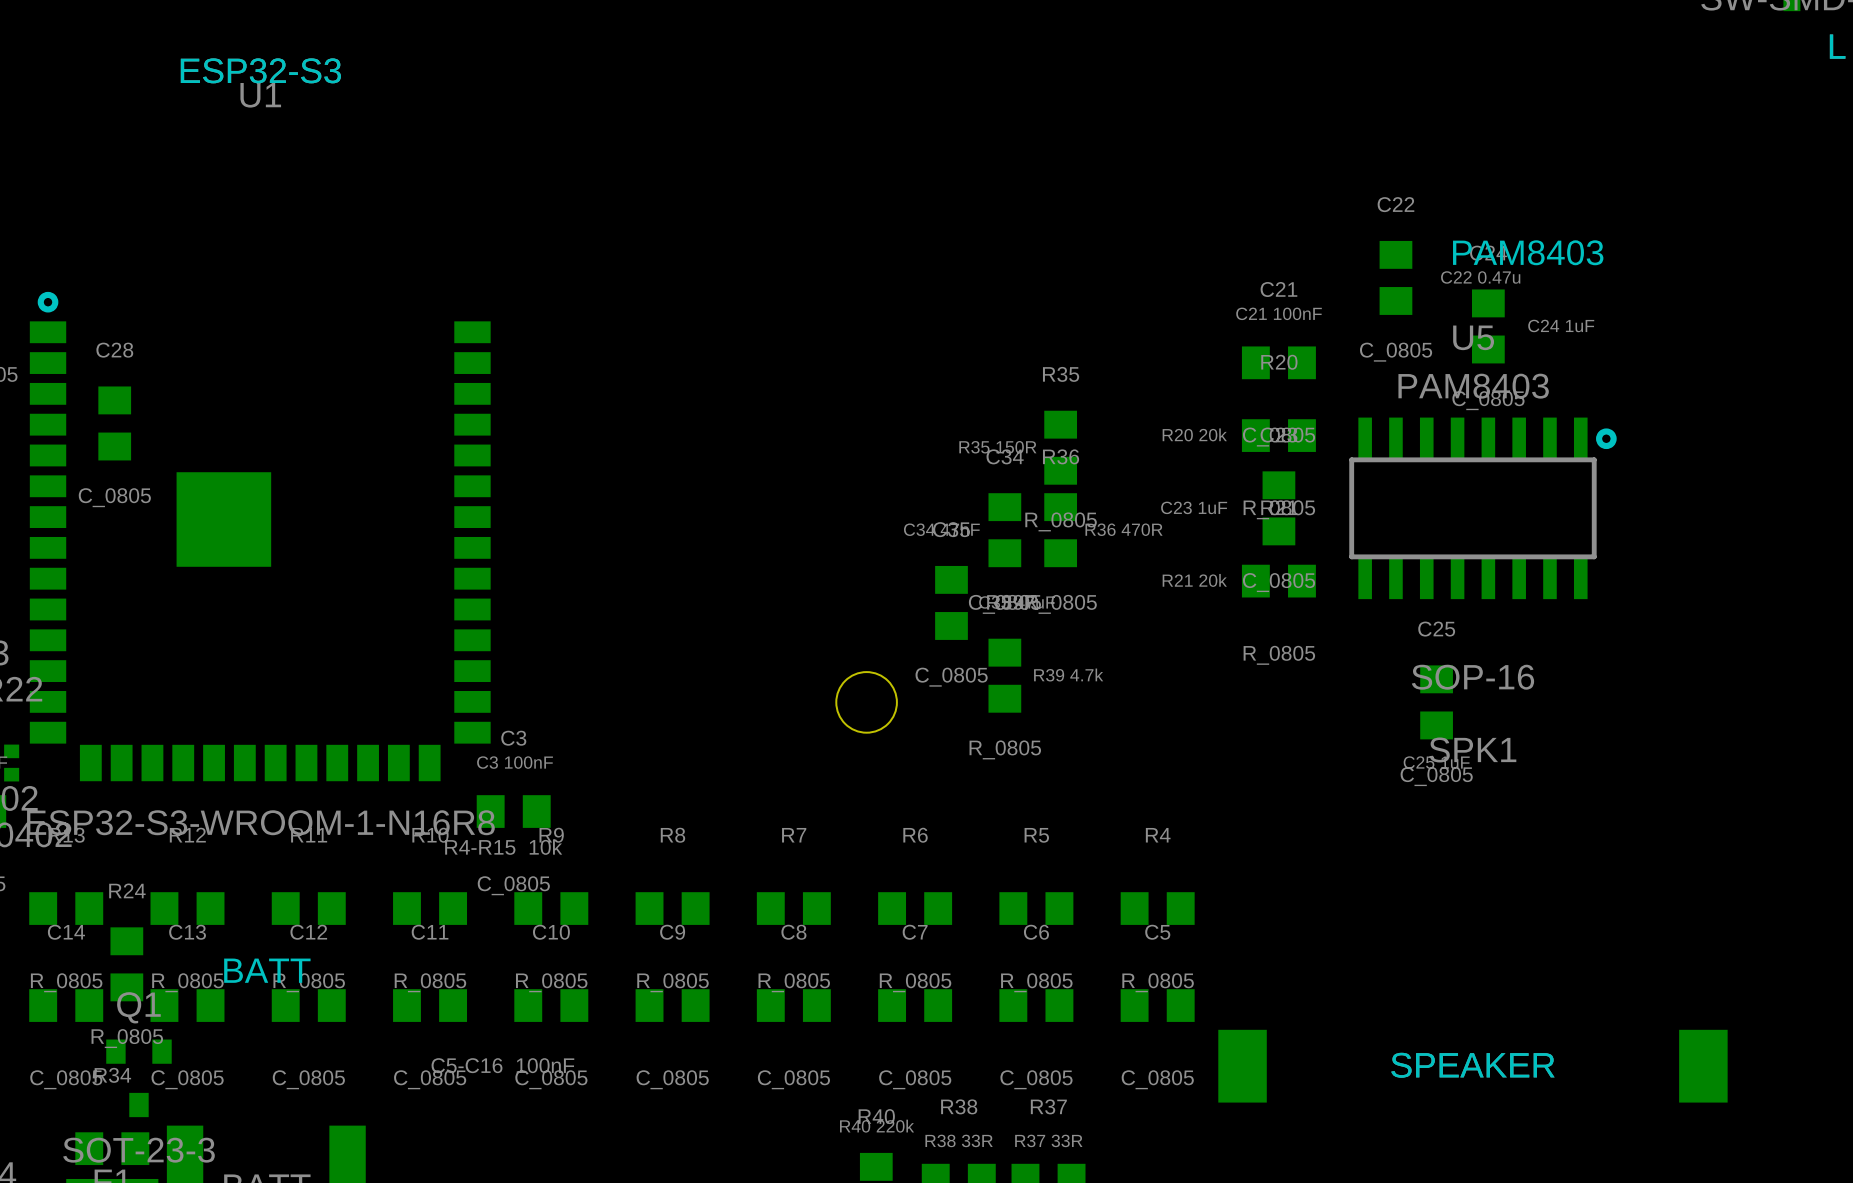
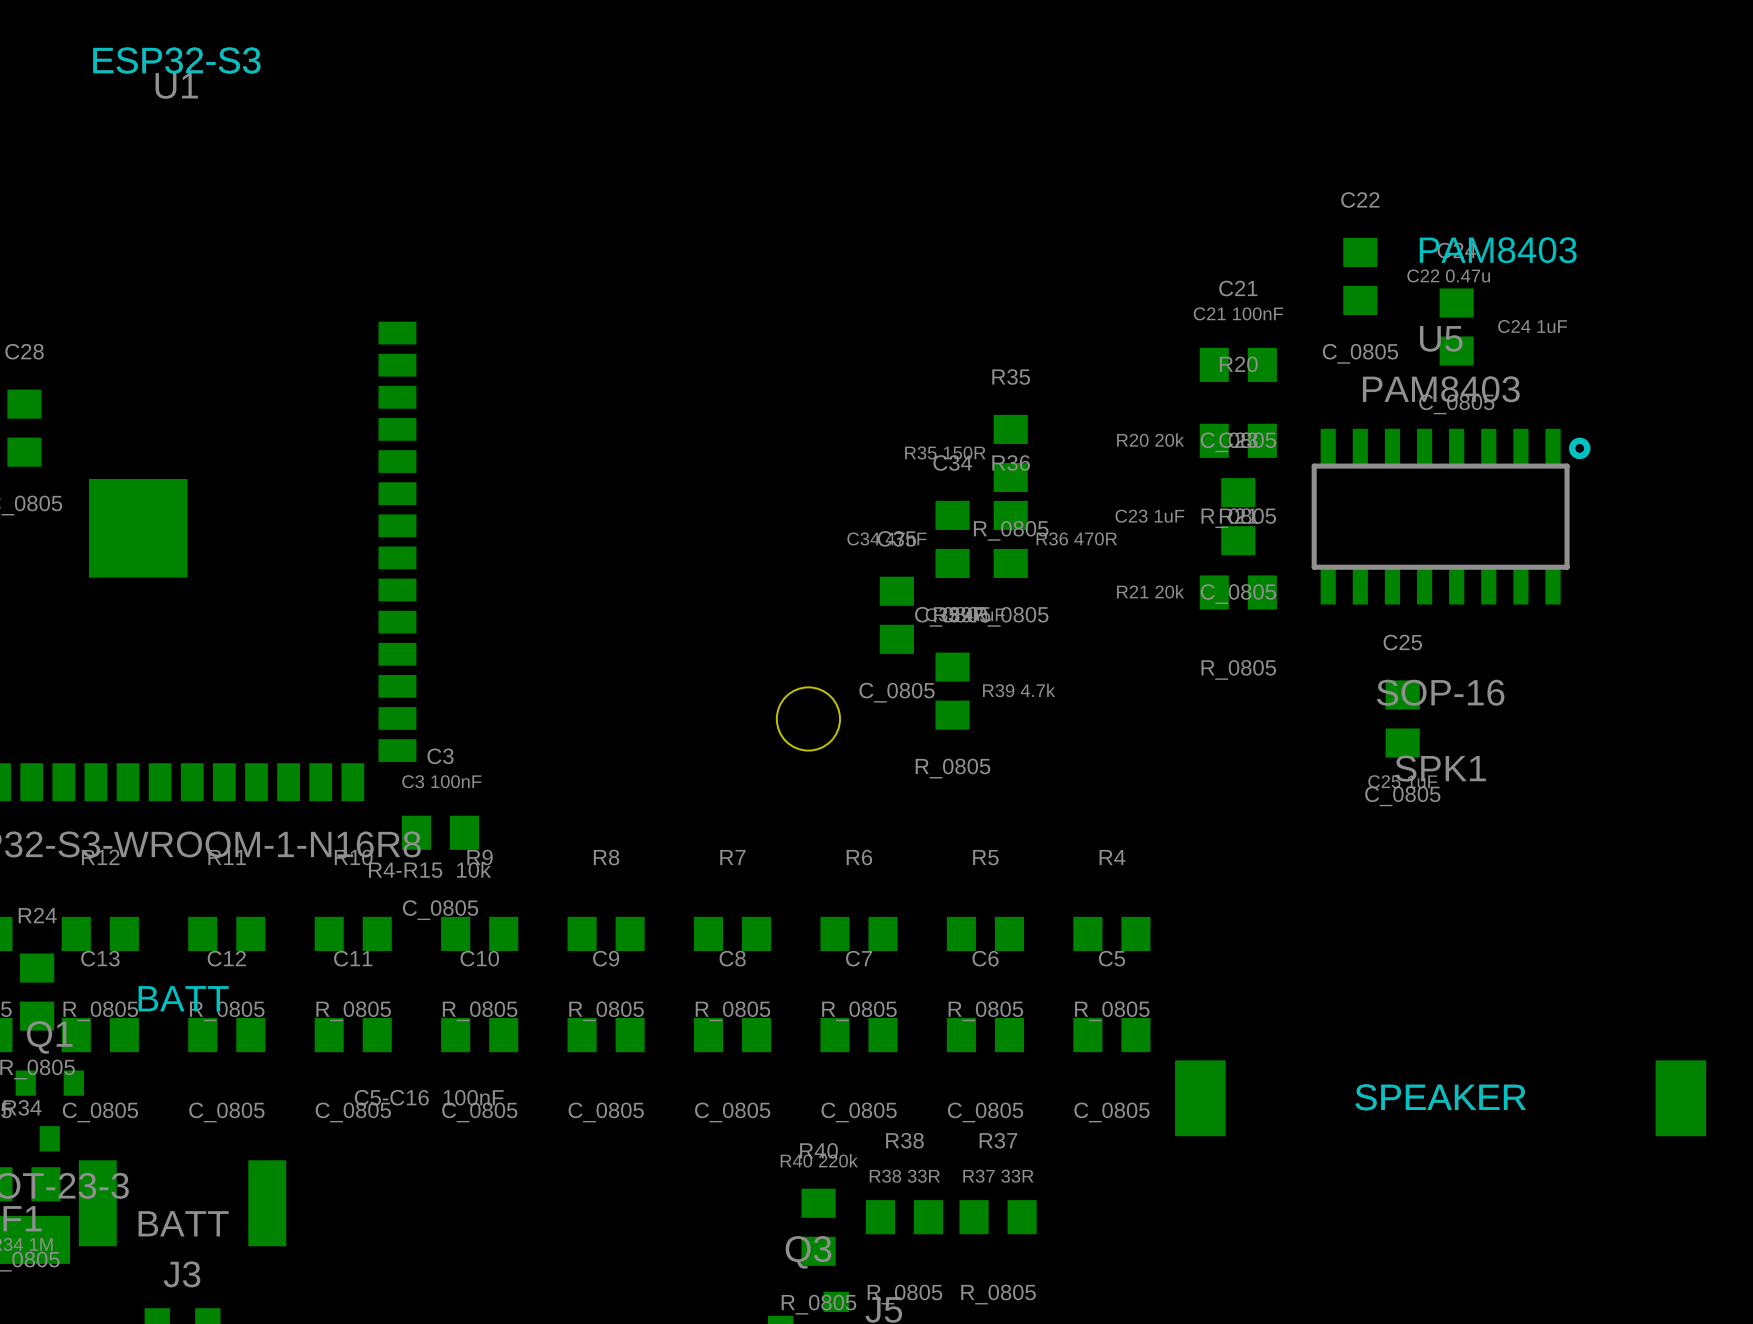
U5 footprint: [1349, 417, 1617, 600] -> [1311, 428, 1591, 605]

